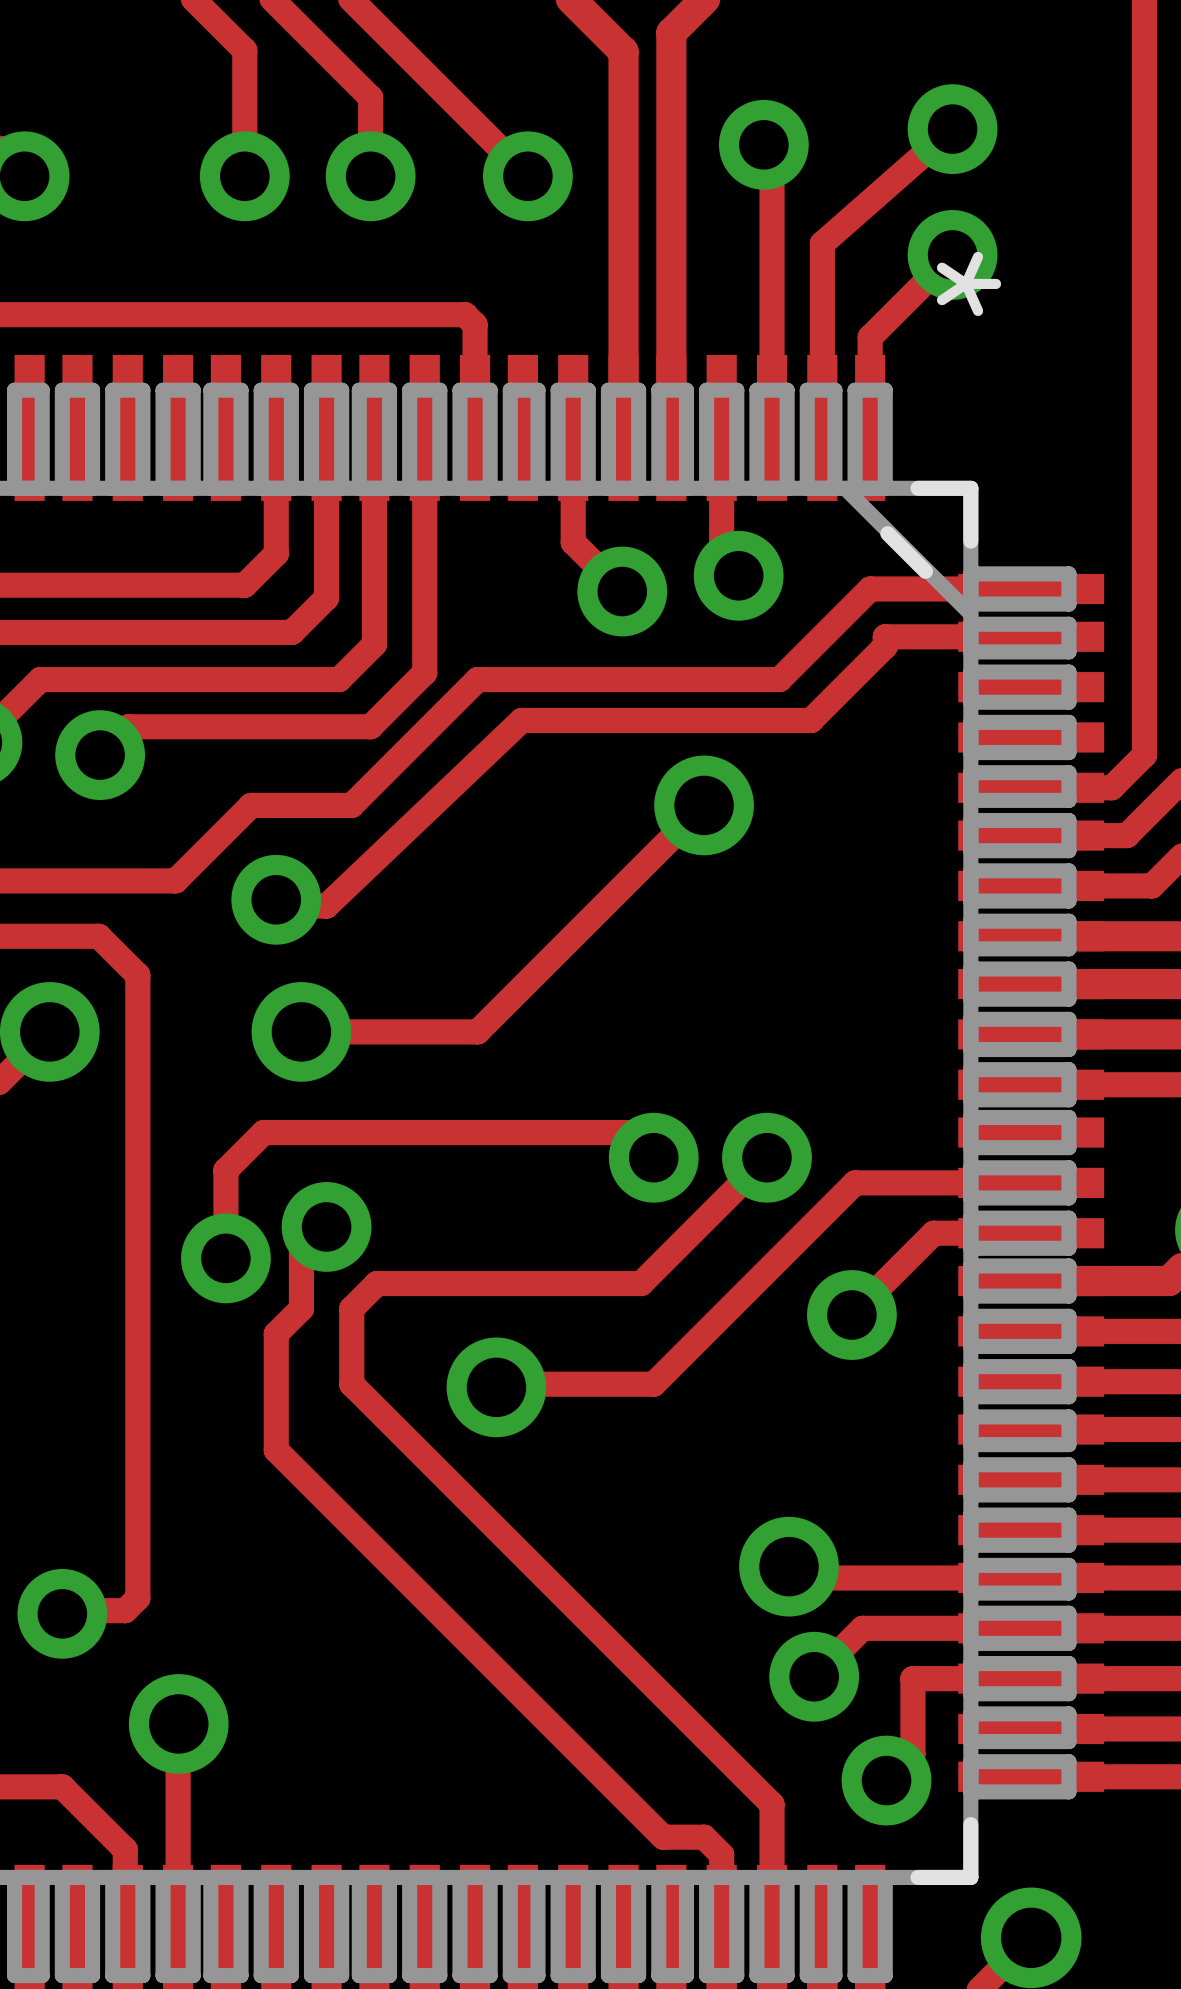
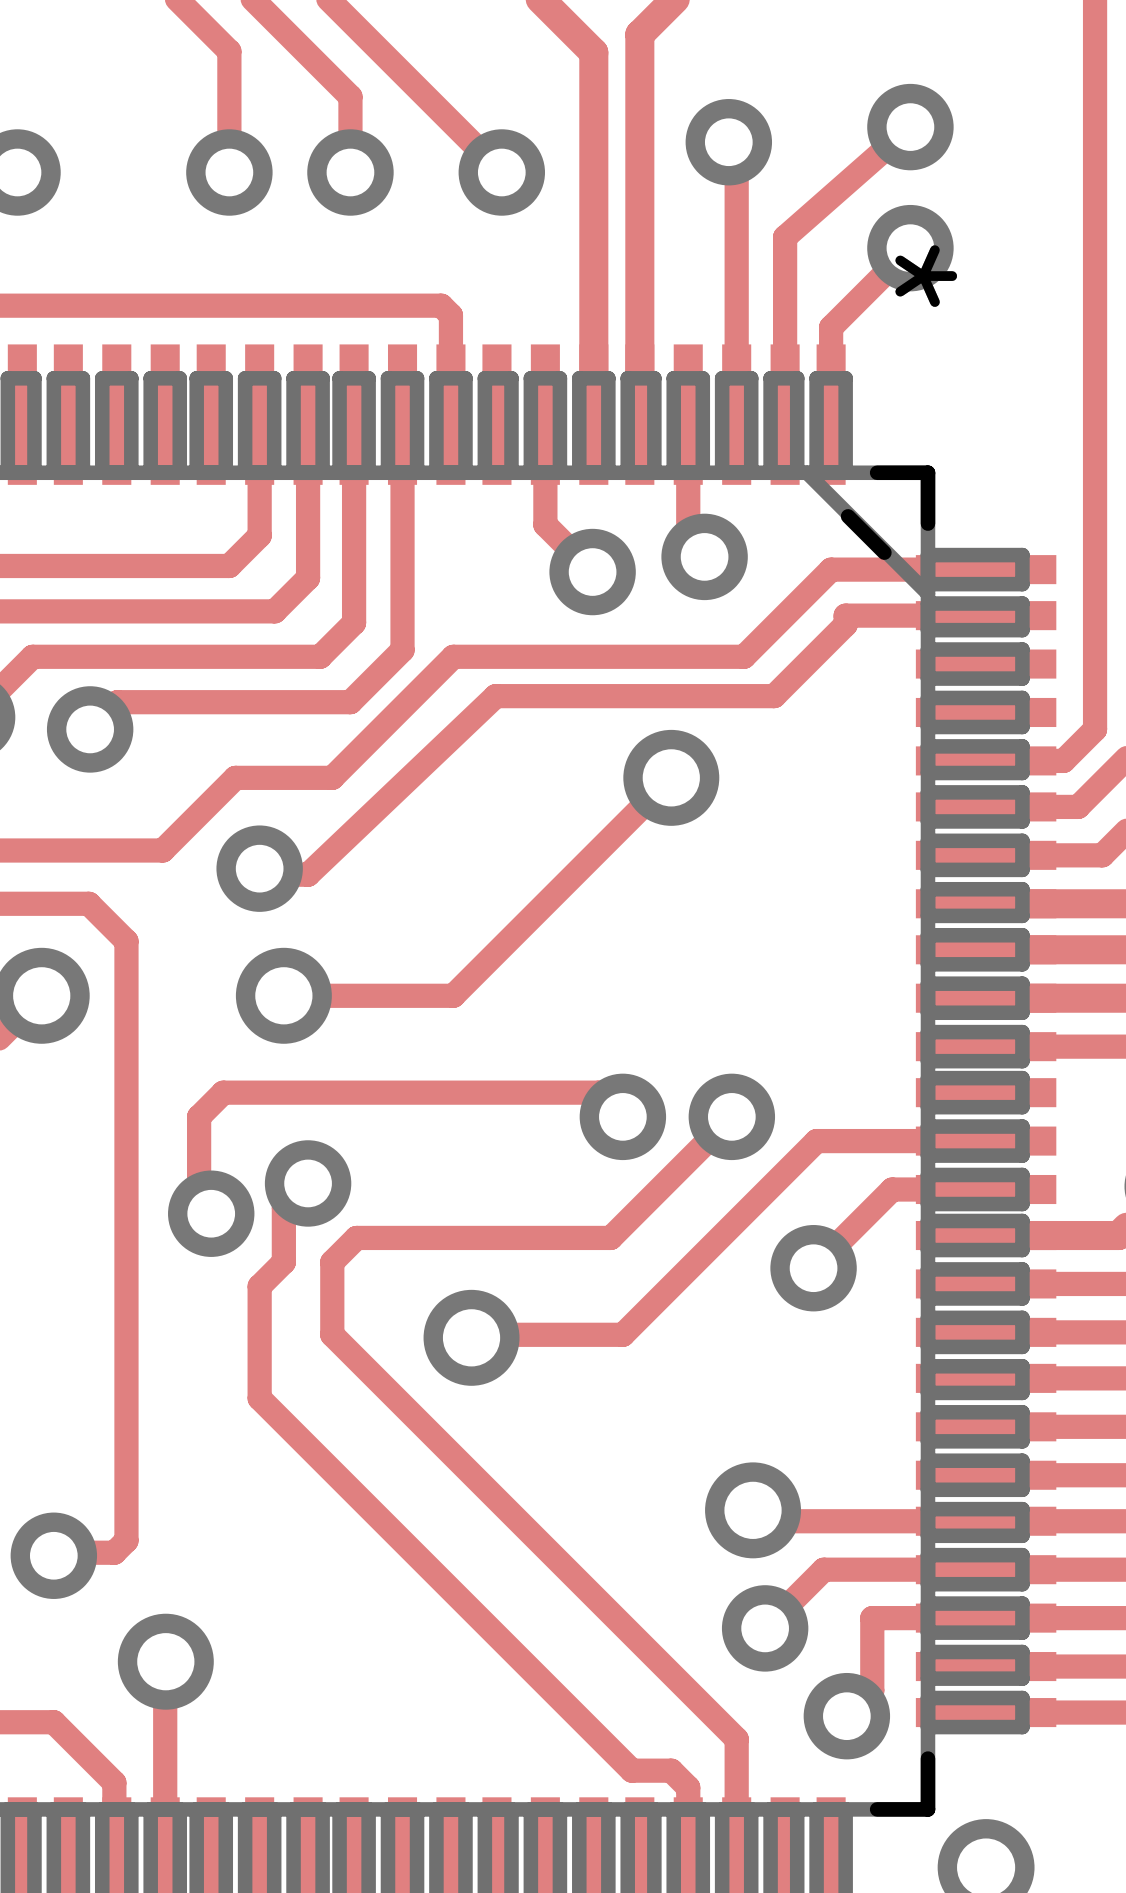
track: (263, 1132) (225, 1170) (225, 1258) -> (247, 1092) (223, 1092) (199, 1116) (199, 1213)
via position: (814, 1676) -> (765, 1628)

